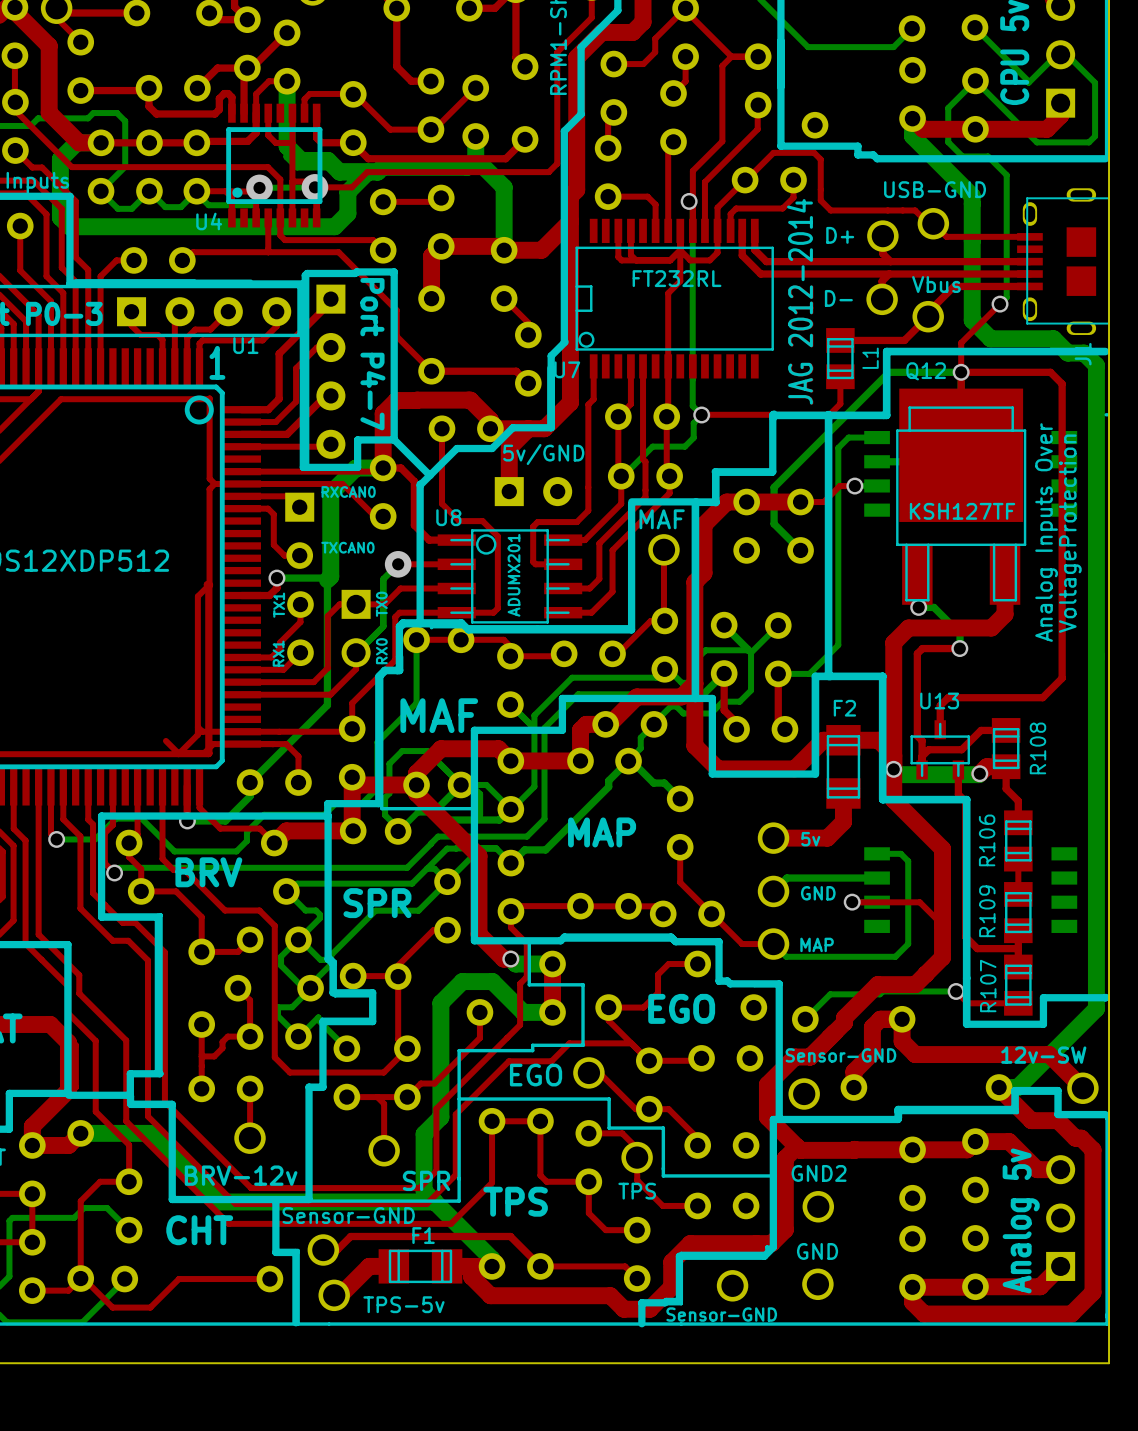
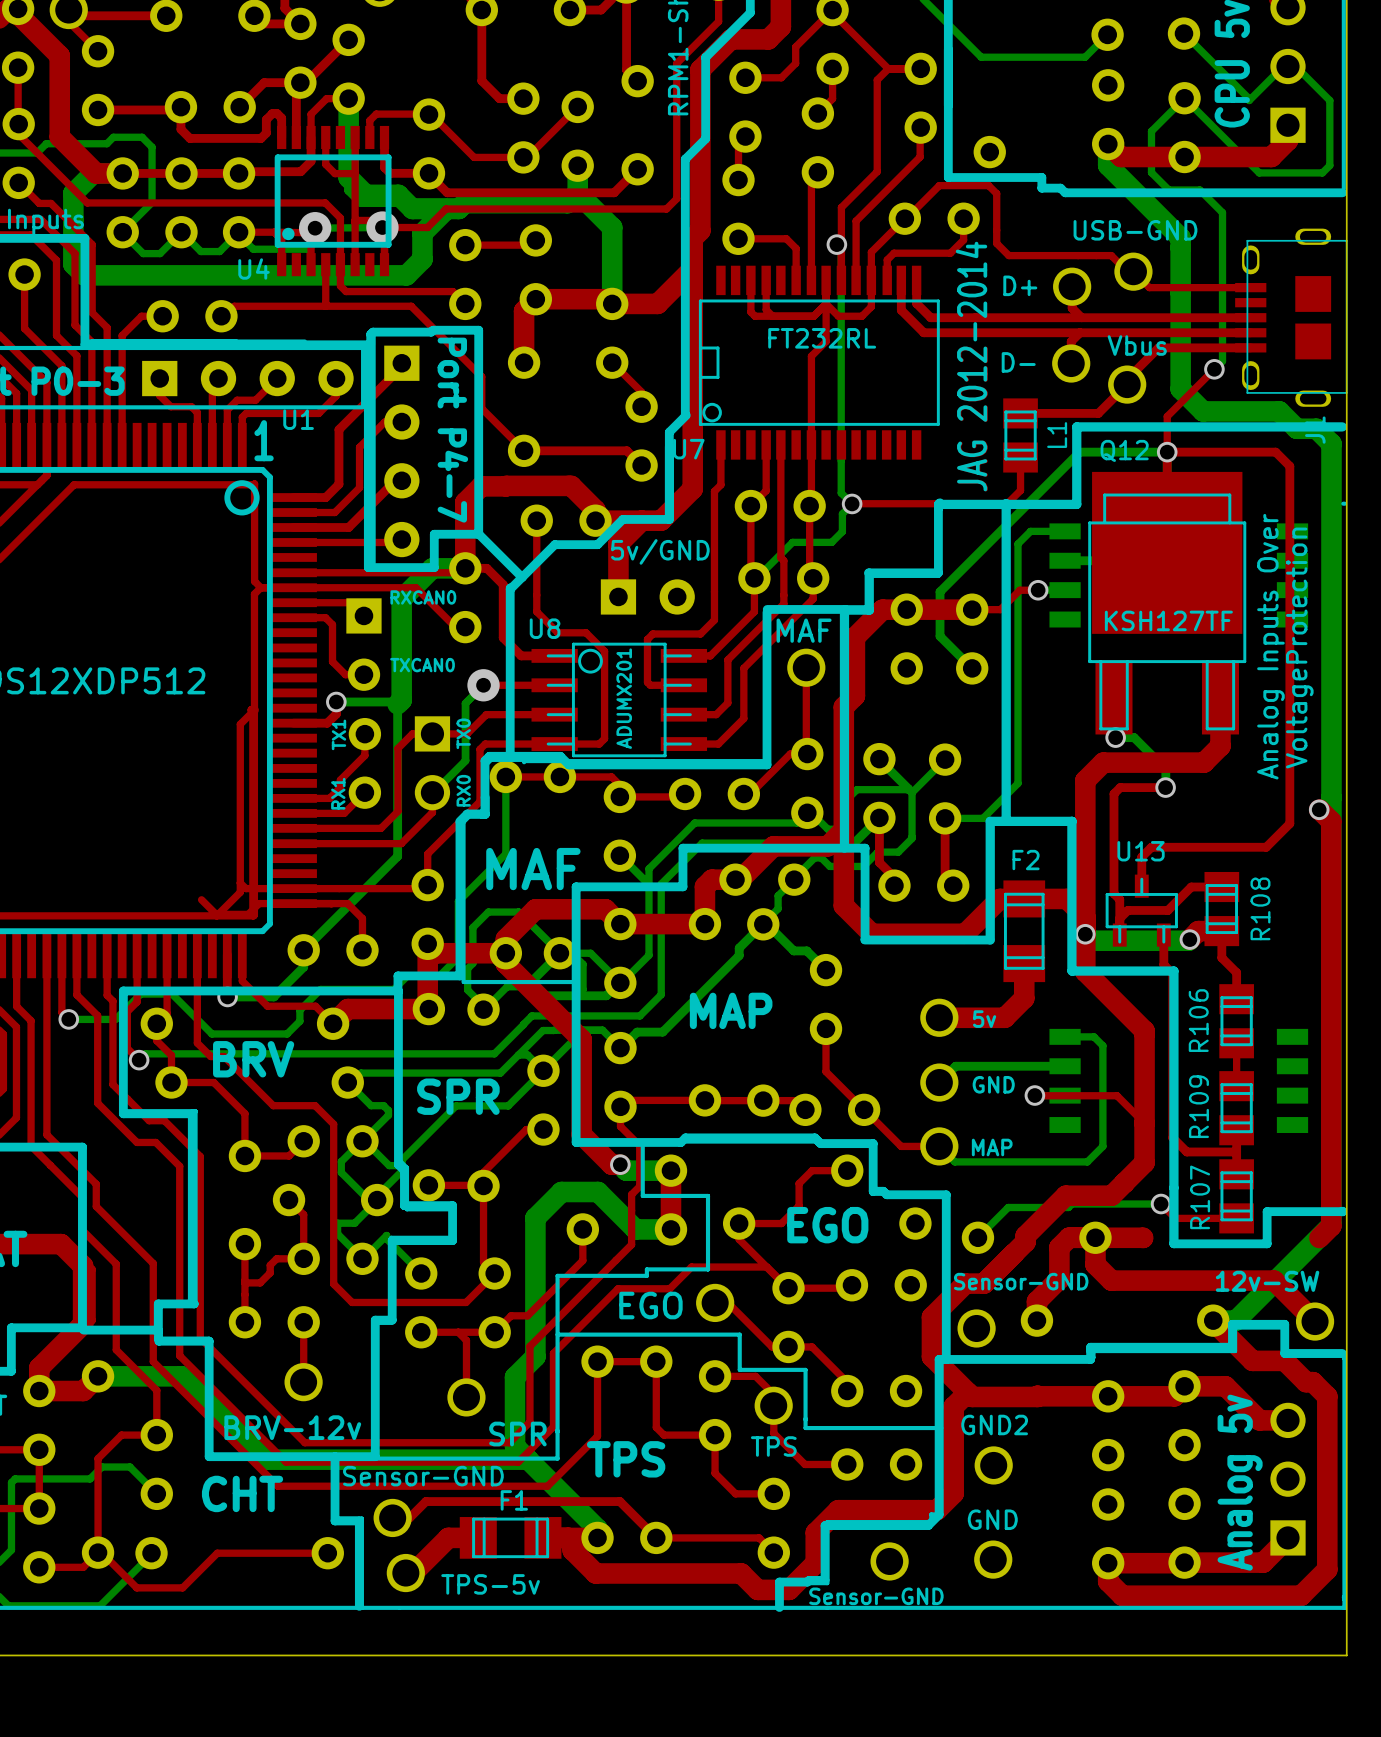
top track: none -> (1319, 809) (1331, 821) (1331, 1226) (1319, 1238)
via: none -> (1319, 809)
top track: none -> (1095, 1237) (1142, 1237)

